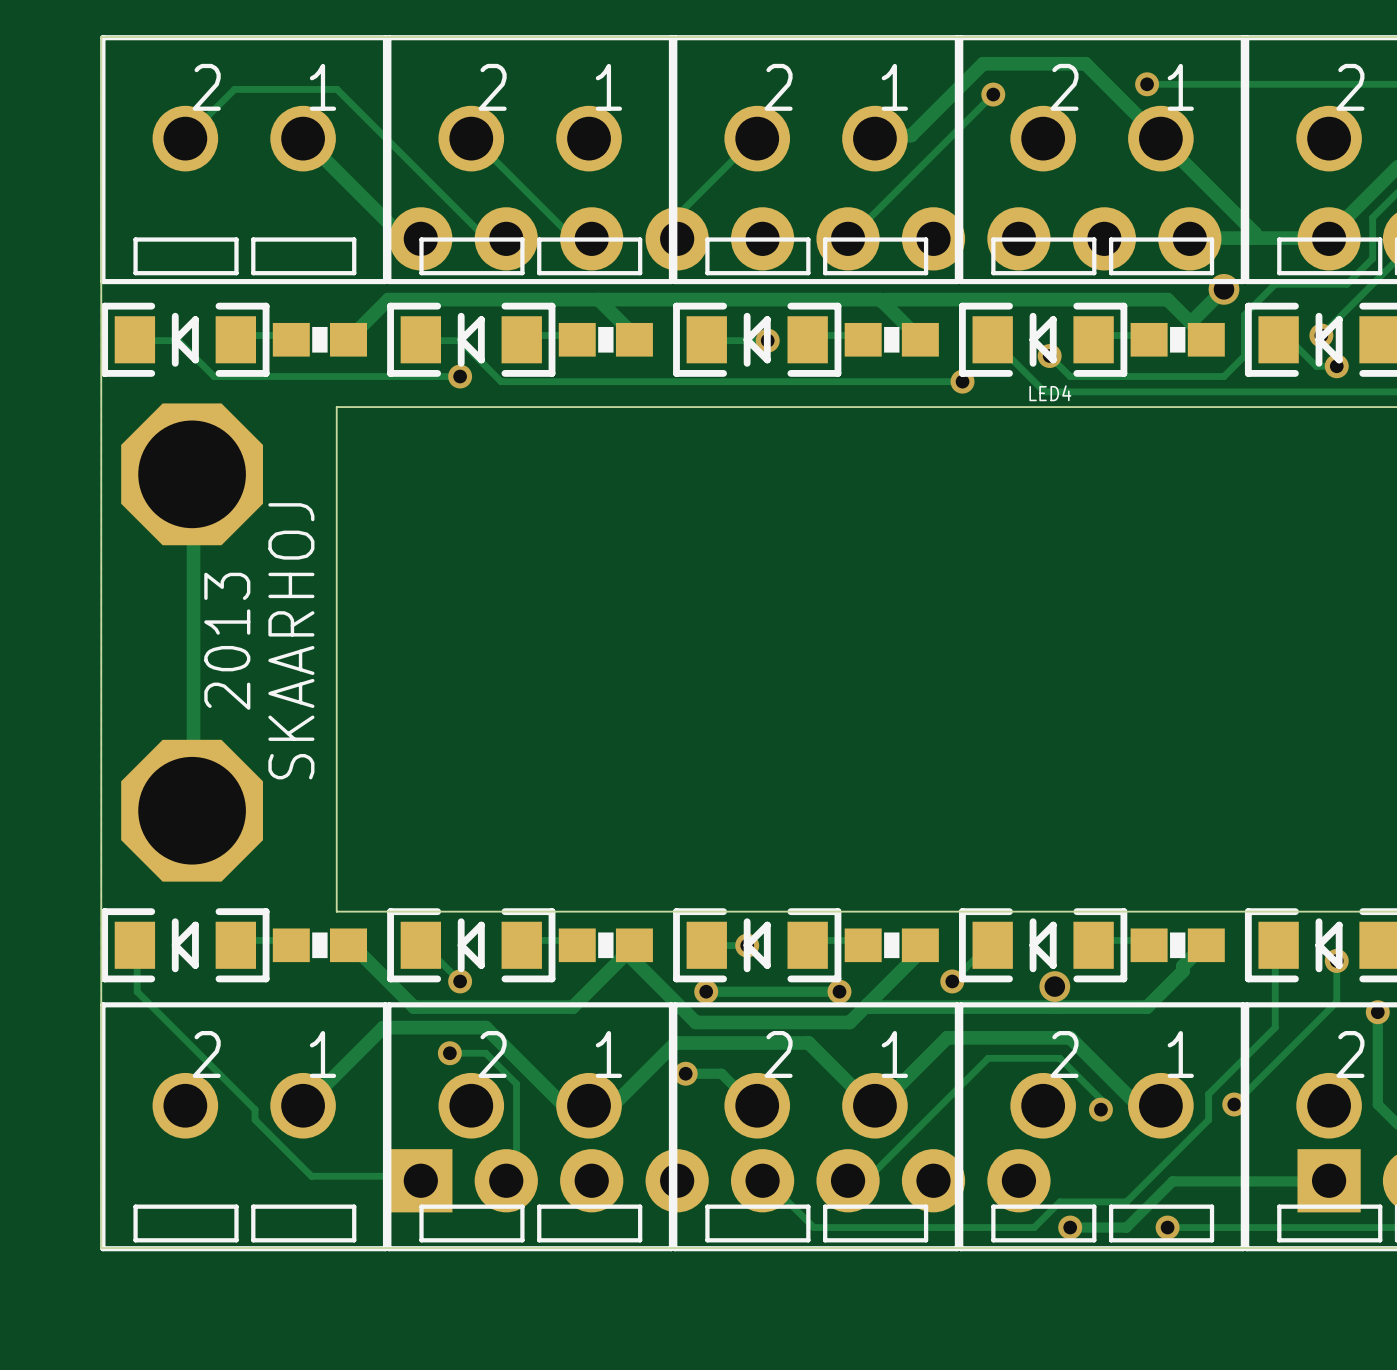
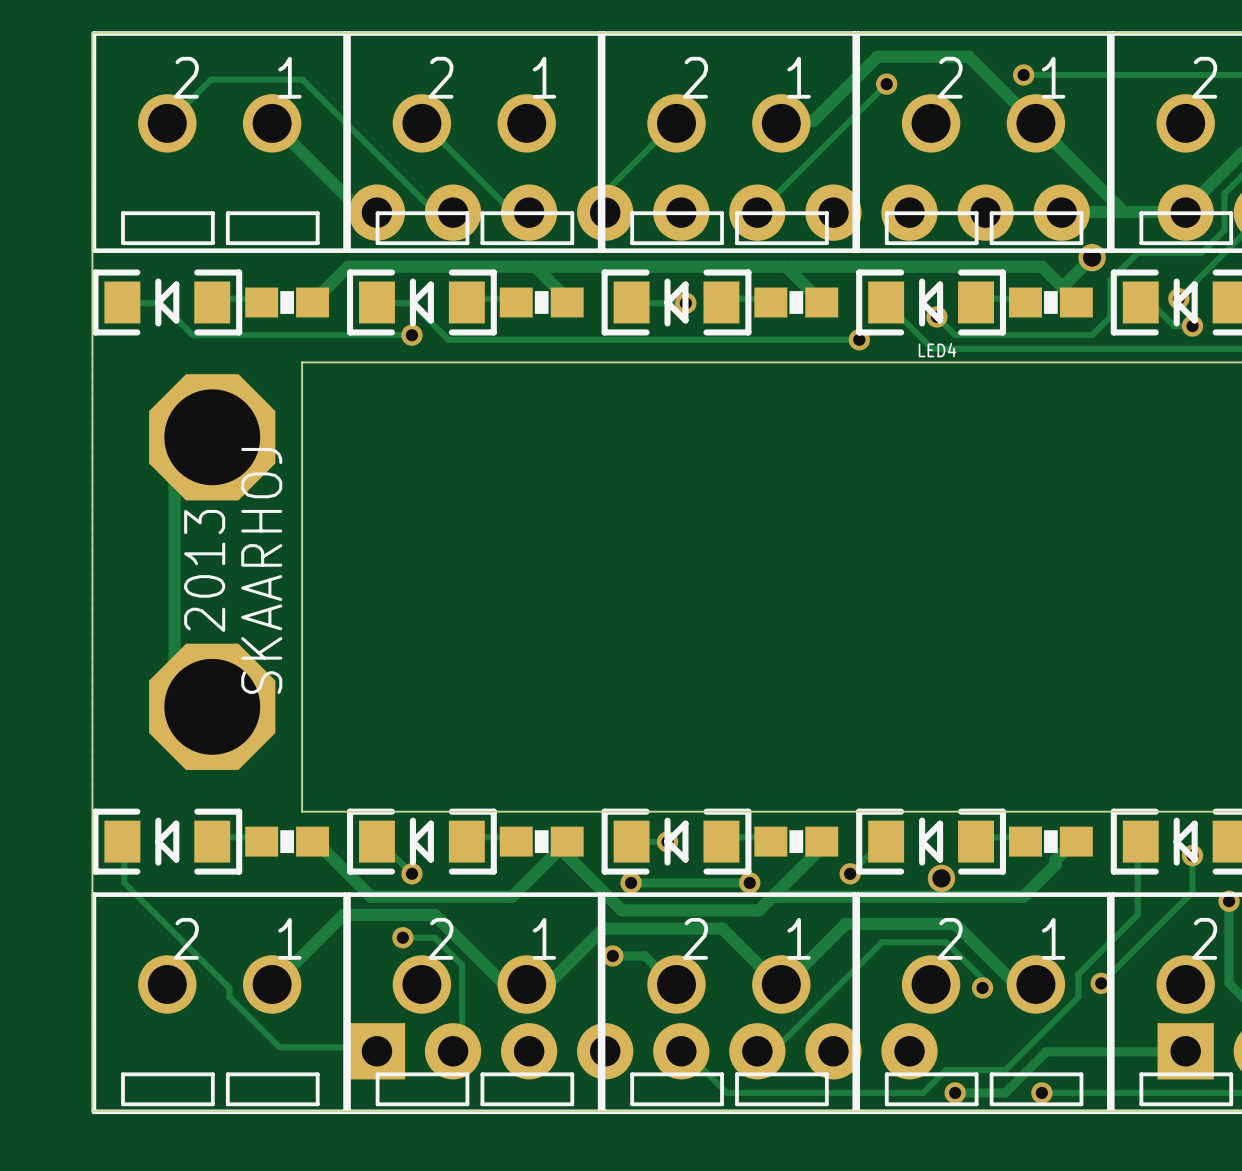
part position: (192, 474) -> (212, 437)
part position: (192, 810) -> (212, 706)

